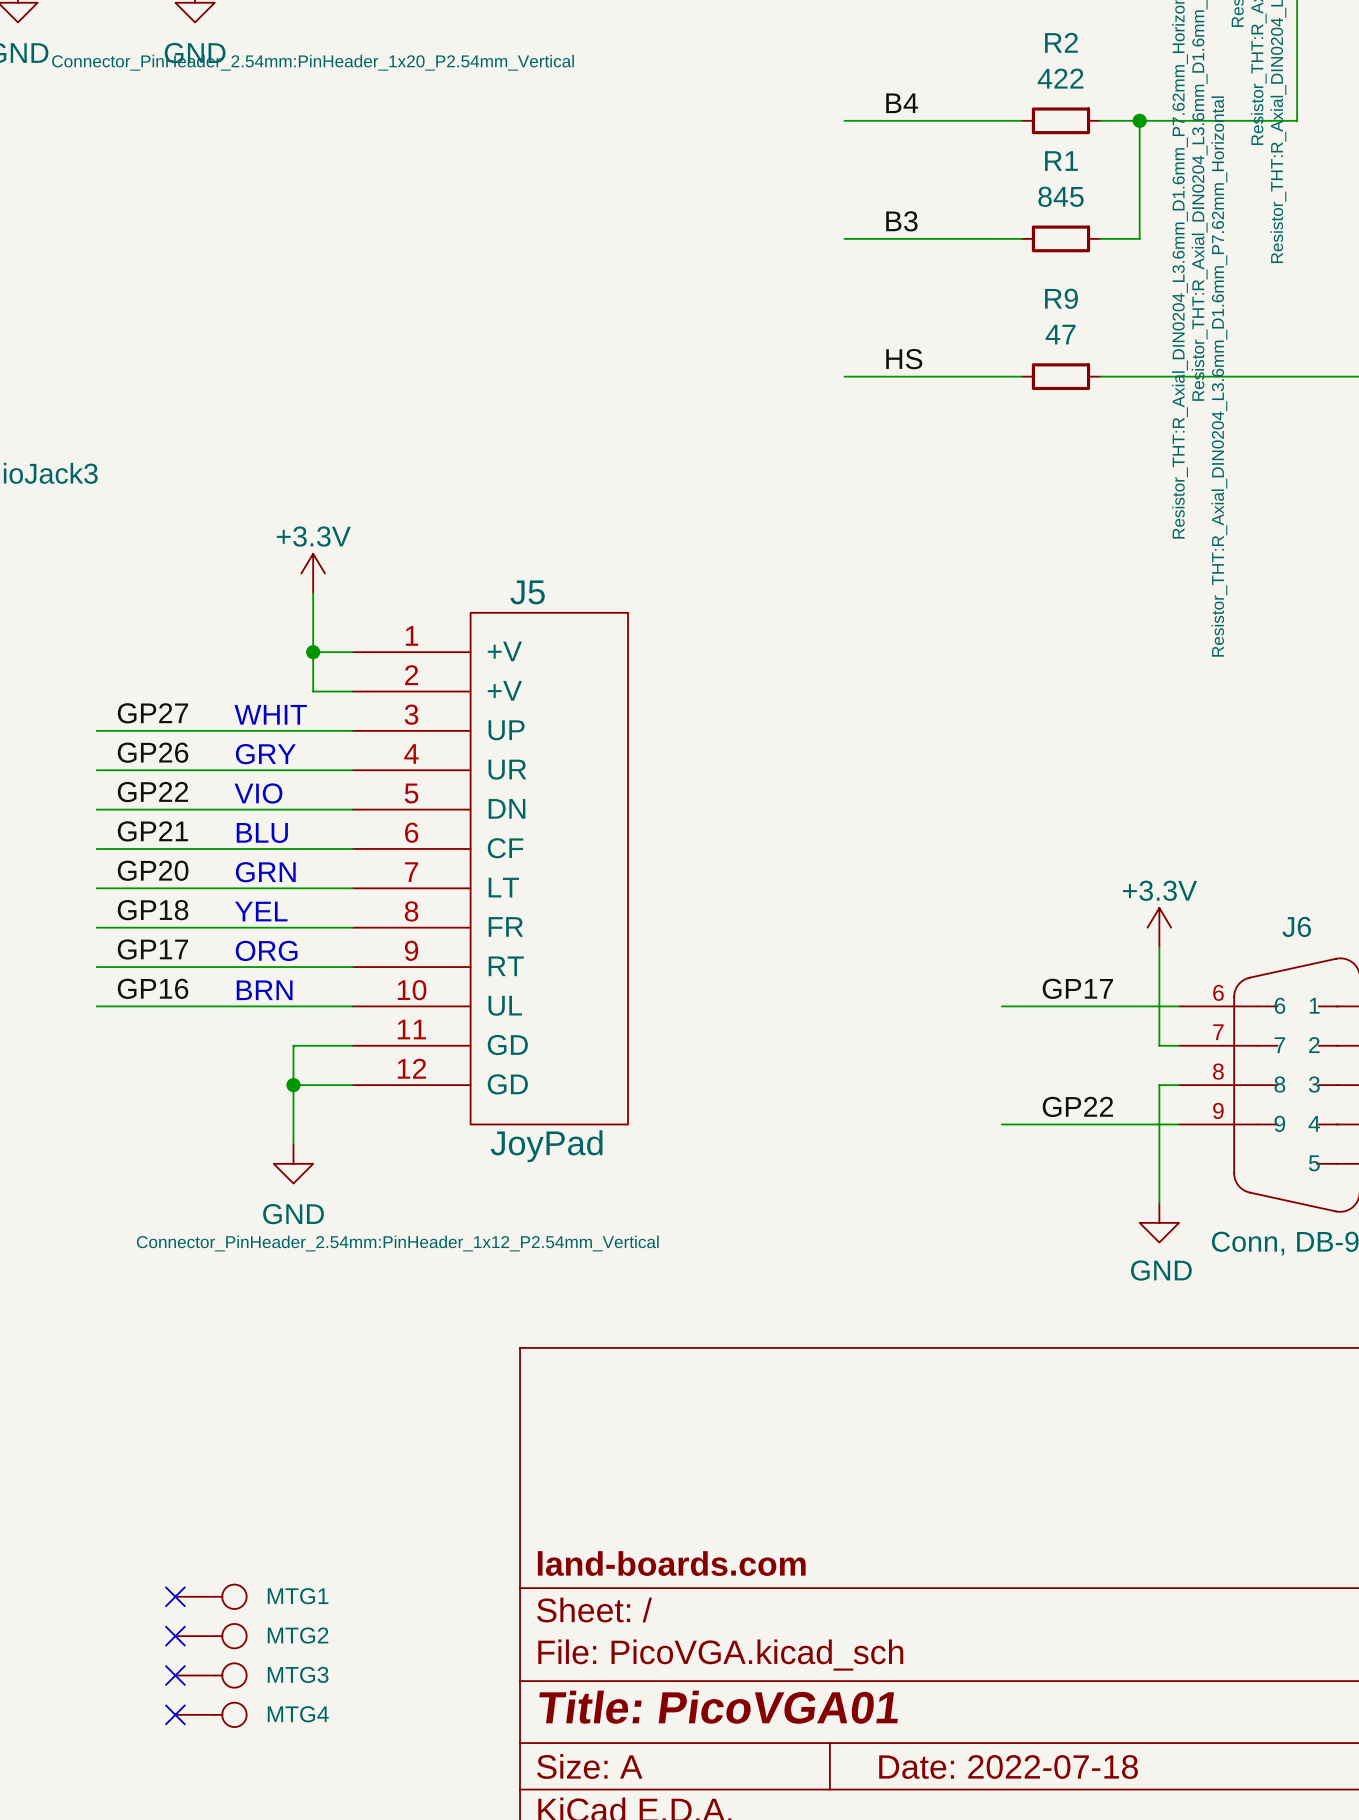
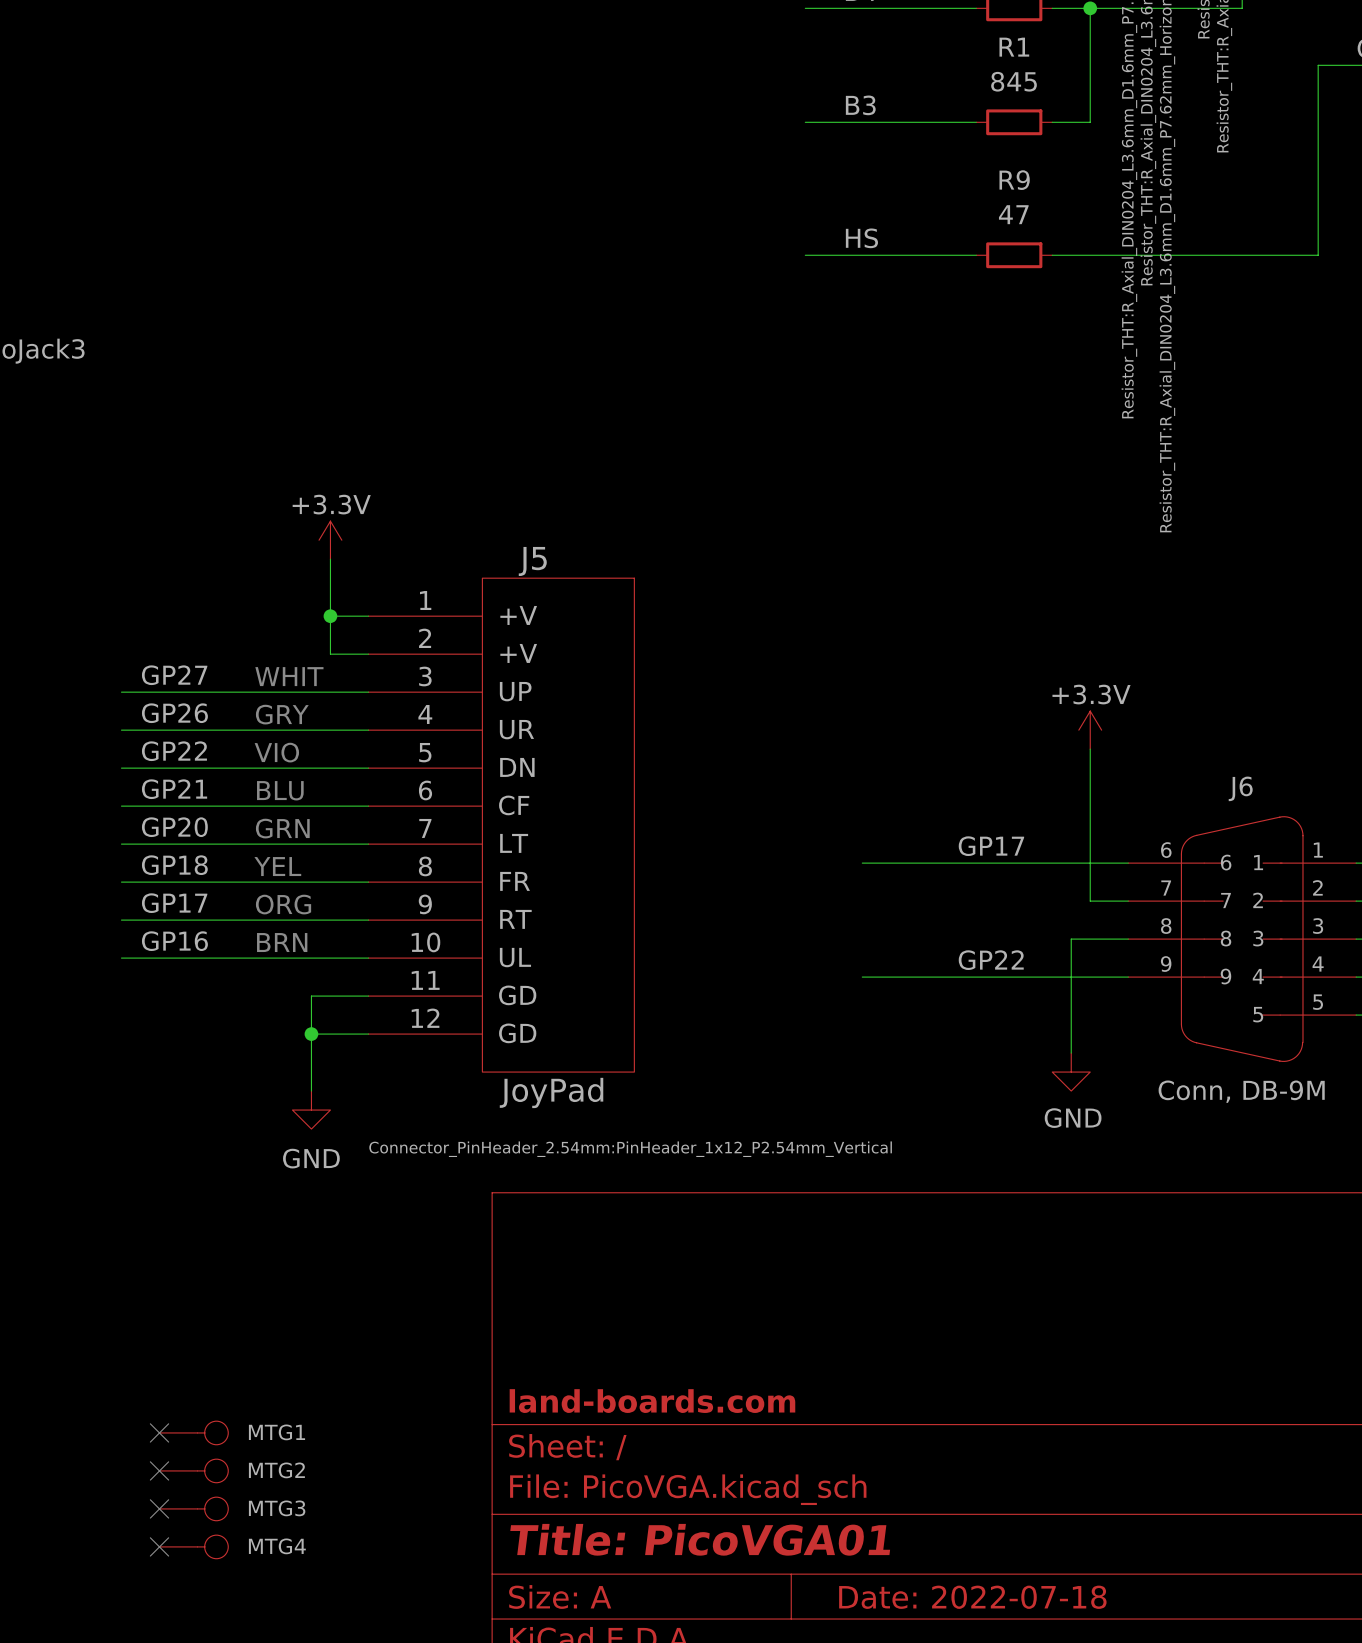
power symbol position: +3.3V (313, 573) -> +3.3V (330, 540)
wire: (313, 593) (313, 691) (352, 691) -> (368, 654) (330, 654) (330, 559)
wire: (313, 652) (352, 652) -> (330, 616) (368, 616)
junction: (313, 652) -> none
label position: GP27 (152, 713) -> GP27 (174, 675)
text position: WHIT (270, 714) -> WHIT (289, 676)
wire: (96, 730) (352, 730) -> (121, 692) (368, 692)
junction: none -> (330, 616)
label position: GP26 (153, 752) -> GP26 (174, 713)
text position: GRY (265, 754) -> GRY (282, 714)
wire: (96, 770) (352, 770) -> (121, 730) (368, 730)
label position: GP22 (152, 792) -> GP22 (174, 751)
text position: VIO (258, 793) -> VIO (276, 752)
wire: (96, 809) (352, 809) -> (121, 768) (368, 768)
label position: GP21 (152, 831) -> GP21 (174, 789)
text position: BLU (262, 832) -> BLU (280, 790)
wire: (96, 848) (352, 848) -> (121, 806) (368, 806)
J5 position: (490, 868) -> (501, 825)
label position: GP20 (153, 870) -> GP20 (174, 827)
text position: GRN (265, 872) -> GRN (282, 828)
wire: (96, 888) (352, 888) -> (121, 844) (368, 844)
label position: GP18 (153, 910) -> GP18 (174, 865)
text position: YEL (261, 911) -> YEL (277, 866)
wire: (96, 927) (352, 927) -> (121, 882) (368, 882)
power symbol position: +3.3V (1159, 927) -> +3.3V (1090, 730)
wire: (1159, 947) (1159, 1045) -> (1090, 749) (1090, 901) (1109, 901)
label position: GP17 (152, 949) -> GP17 (174, 903)
text position: ORG (266, 950) -> ORG (283, 904)
wire: (96, 967) (352, 967) -> (121, 920) (368, 920)
label position: GP16 (153, 988) -> GP16 (174, 941)
label position: GP17 (1077, 988) -> GP17 (991, 846)
text position: BRN (264, 990) -> BRN (282, 942)
wire: (96, 1006) (352, 1006) -> (121, 958) (368, 958)
wire: none -> (862, 863) (957, 863)
wire: (352, 1045) (293, 1045) (293, 1144) -> (368, 996) (311, 996) (311, 1091)
wire: (293, 1085) (352, 1085) -> (311, 1034) (368, 1034)
junction: (293, 1085) -> none
wire: (1159, 1085) (1159, 1203) -> (1109, 939) (1071, 939) (1071, 1053)
label position: GP22 (1077, 1106) -> GP22 (991, 960)
wire: none -> (862, 977) (957, 977)
power symbol position: GND (293, 1163) -> GND (311, 1110)
junction: none -> (311, 1034)
power symbol position: GND (1159, 1222) -> GND (1071, 1072)
J5 text position: Connector_PinHeader_2.54mm:PinHeader_1x12_P2.54mm_Vertical (397, 1243) -> Connector_PinHeader_2.54mm:PinHeader_1x12_P2.54mm_Vertical (630, 1149)

